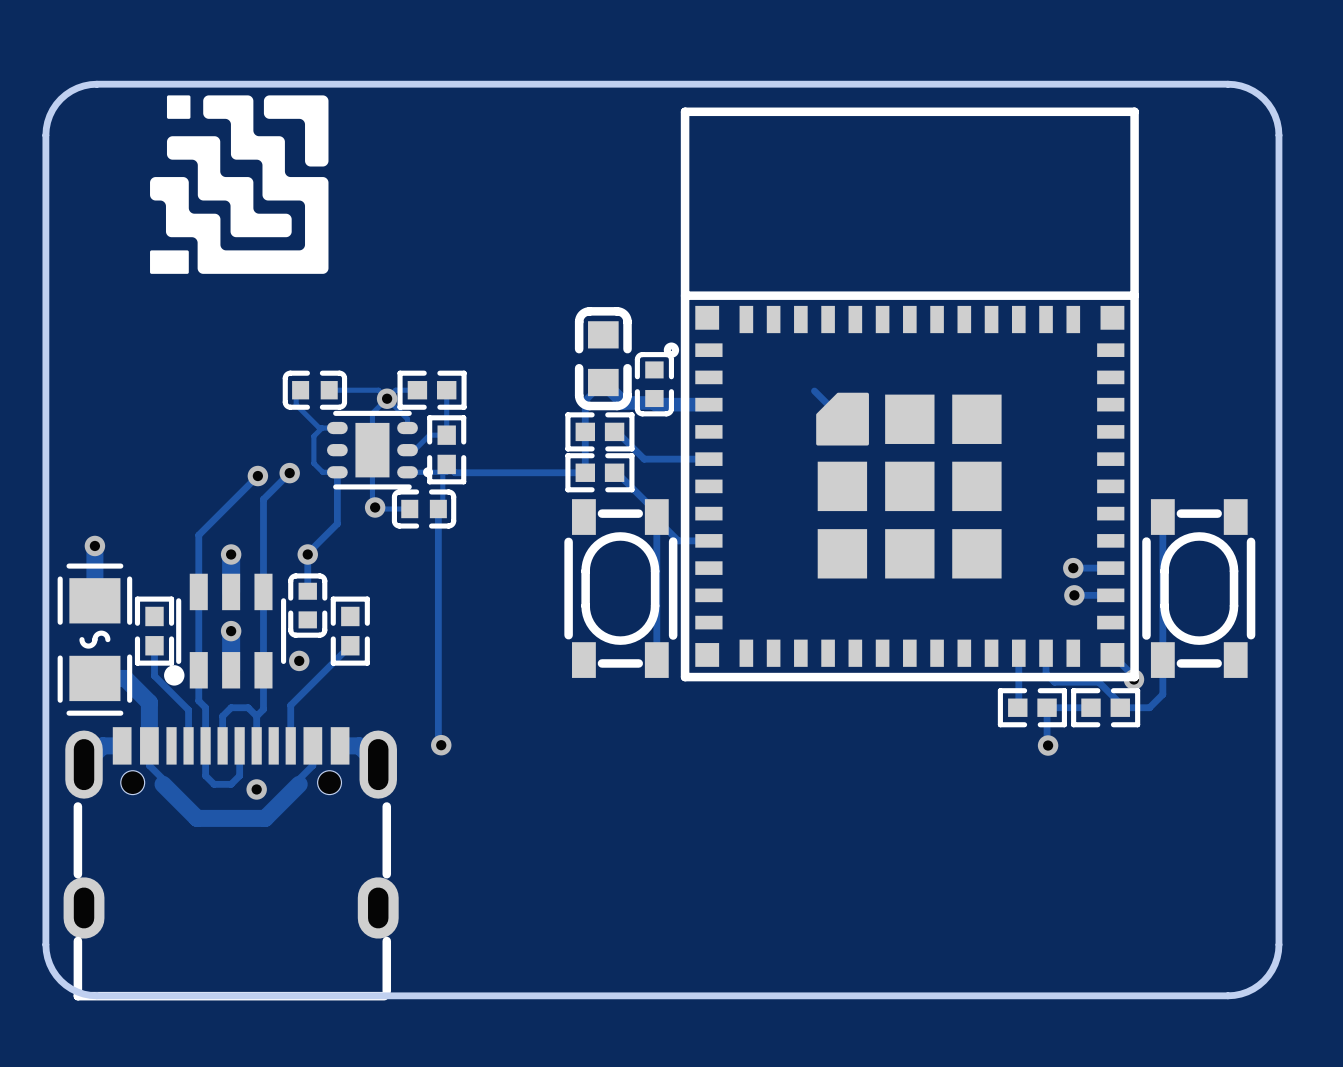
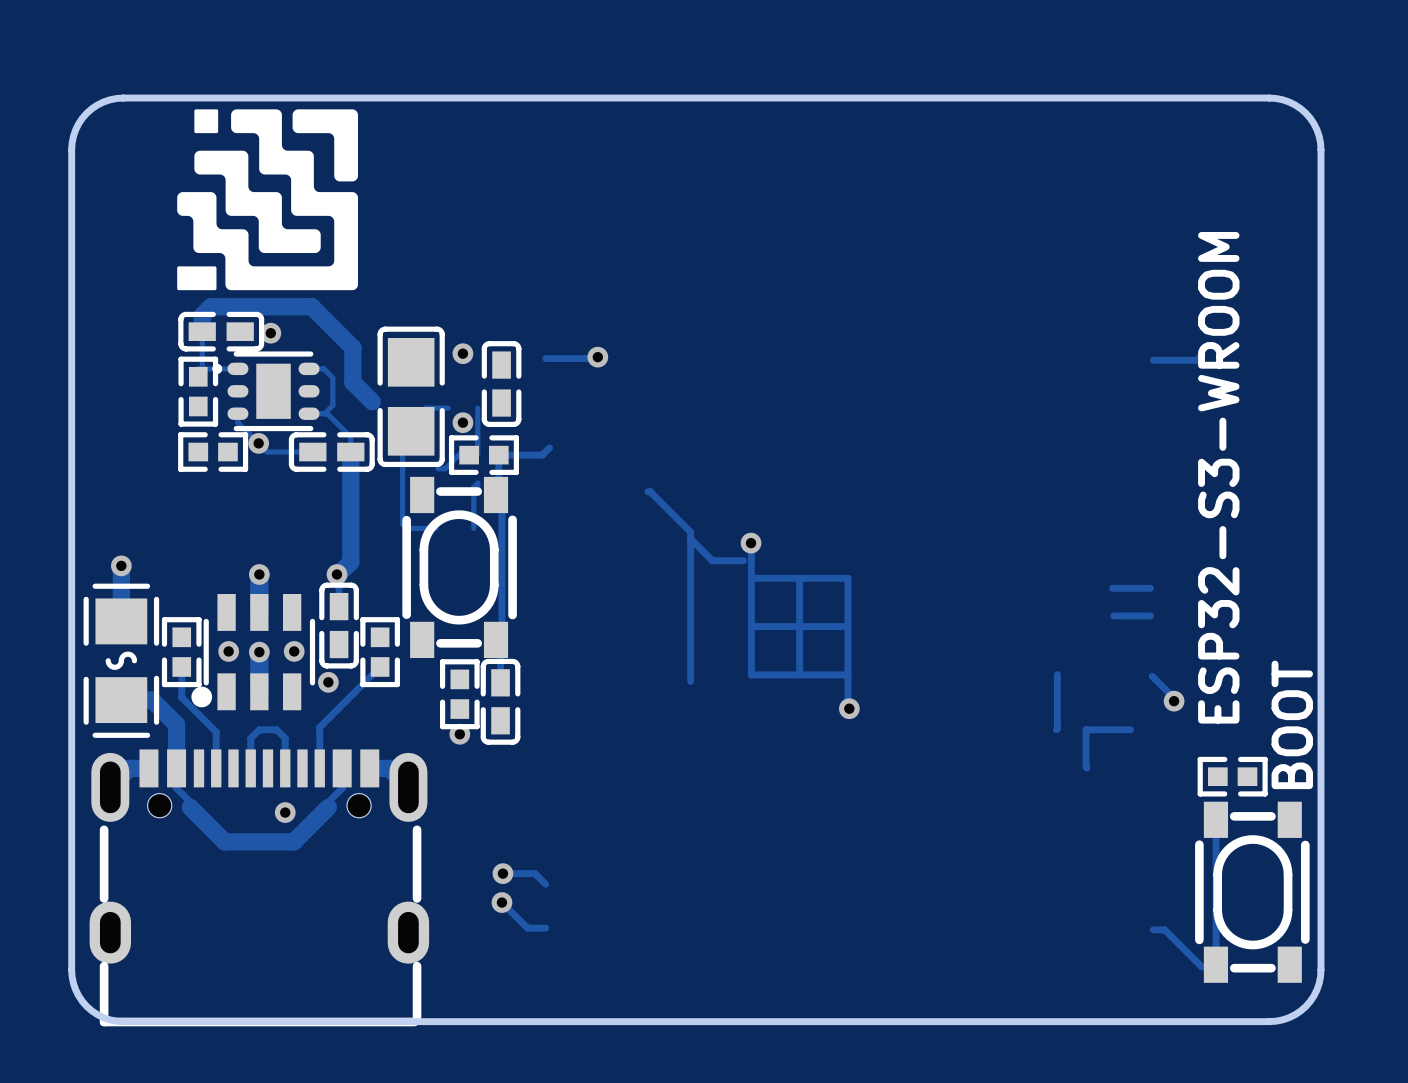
part: none -> (221, 331)
via: none -> (270, 333)
via: none -> (462, 353)
track: none -> (597, 357) (545, 358)
via: none -> (597, 357)
track: none -> (1200, 356) (1196, 360) (1153, 360)
track: none -> (237, 368) (198, 368) (198, 376) (202, 372) (202, 331) (202, 315) (211, 306) (311, 306) (352, 347) (352, 382) (372, 401)
track: none -> (309, 368) (323, 368) (332, 377) (332, 405) (324, 413)
part: (603, 358) -> none
part: none -> (501, 384)
part: none -> (198, 391)
part: none -> (411, 396)
part: (654, 384) -> none
track: (296, 390) (296, 404) (319, 428) (337, 428) -> none
part: (314, 390) -> none
track: (333, 390) (378, 390) (407, 419) (407, 428) -> none
part: (432, 390) -> none
track: (814, 391) (842, 418) -> none
part: (901, 394) -> none
track: none -> (237, 413) (237, 422) (267, 452) (312, 452)
track: none -> (309, 413) (327, 413) (350, 437) (350, 562) (339, 573) (339, 606)
via: (387, 398) -> none
via: none -> (462, 422)
track: (708, 404) (623, 402) (603, 382) (585, 400) (585, 472) (455, 472) (446, 464) -> none
via: none -> (258, 443)
track: (322, 428) (313, 436) (313, 463) (322, 472) (337, 472) (337, 523) (307, 553) (307, 586) -> none
track: none -> (549, 447) (542, 455) (498, 455) (498, 491) (501, 494) (500, 682)
part: (599, 431) -> none
track: (614, 431) (616, 431) (644, 459) (708, 459) -> none
part: none -> (213, 452)
part: none -> (331, 452)
part rotation: 0° (446, 449) -> 90° clockwise (483, 455)
part rotation: 0° (379, 450) -> 180° (265, 391)
part position: (379, 450) -> (265, 391)
text: none -> ESP32-S3-WROOM (1218, 477)
part: (599, 472) -> none
track: (289, 473) (263, 499) (263, 709) (256, 716) -> none
via: (289, 473) -> none
track: (257, 476) (198, 535) (198, 700) (205, 707) (205, 775) (214, 784) (231, 784) (239, 775) (239, 745) -> none
via: (257, 476) -> none
via: (375, 507) -> none
part: (424, 509) -> none
track: (438, 509) (438, 742) (441, 745) -> none
track: (1162, 517) (1162, 694) (1149, 707) (1120, 707) (1120, 703) (1098, 682) (1054, 682) (1046, 673) (1046, 653) -> none
track: none -> (751, 543) (751, 674) (847, 674)
via: none -> (751, 543)
track: none -> (751, 578) (847, 578) (849, 708)
track: none -> (799, 578) (799, 674)
via: (1073, 568) -> none
part footprint: [288, 573, 328, 638] -> [319, 582, 359, 669]
part position: (620, 588) -> (459, 567)
part position: (1198, 588) -> (1252, 892)
via: (1074, 595) -> none
track: none -> (751, 626) (847, 626)
via: none -> (228, 651)
via: none -> (294, 651)
part: none -> (459, 694)
part: none -> (500, 701)
via: none -> (849, 708)
text: none -> BOOT (1292, 724)
part: (1032, 707) -> none
part: (1105, 707) -> none
via position: (441, 745) -> (459, 734)
via: (1048, 745) -> none
part: none -> (1232, 776)
track: none -> (1216, 821) (1216, 966) (1201, 966) (1164, 929) (1153, 929)
track: none -> (502, 873) (535, 873) (545, 884)
via: none -> (502, 873)
track: none -> (501, 902) (527, 928) (545, 928)
via: none -> (501, 902)

